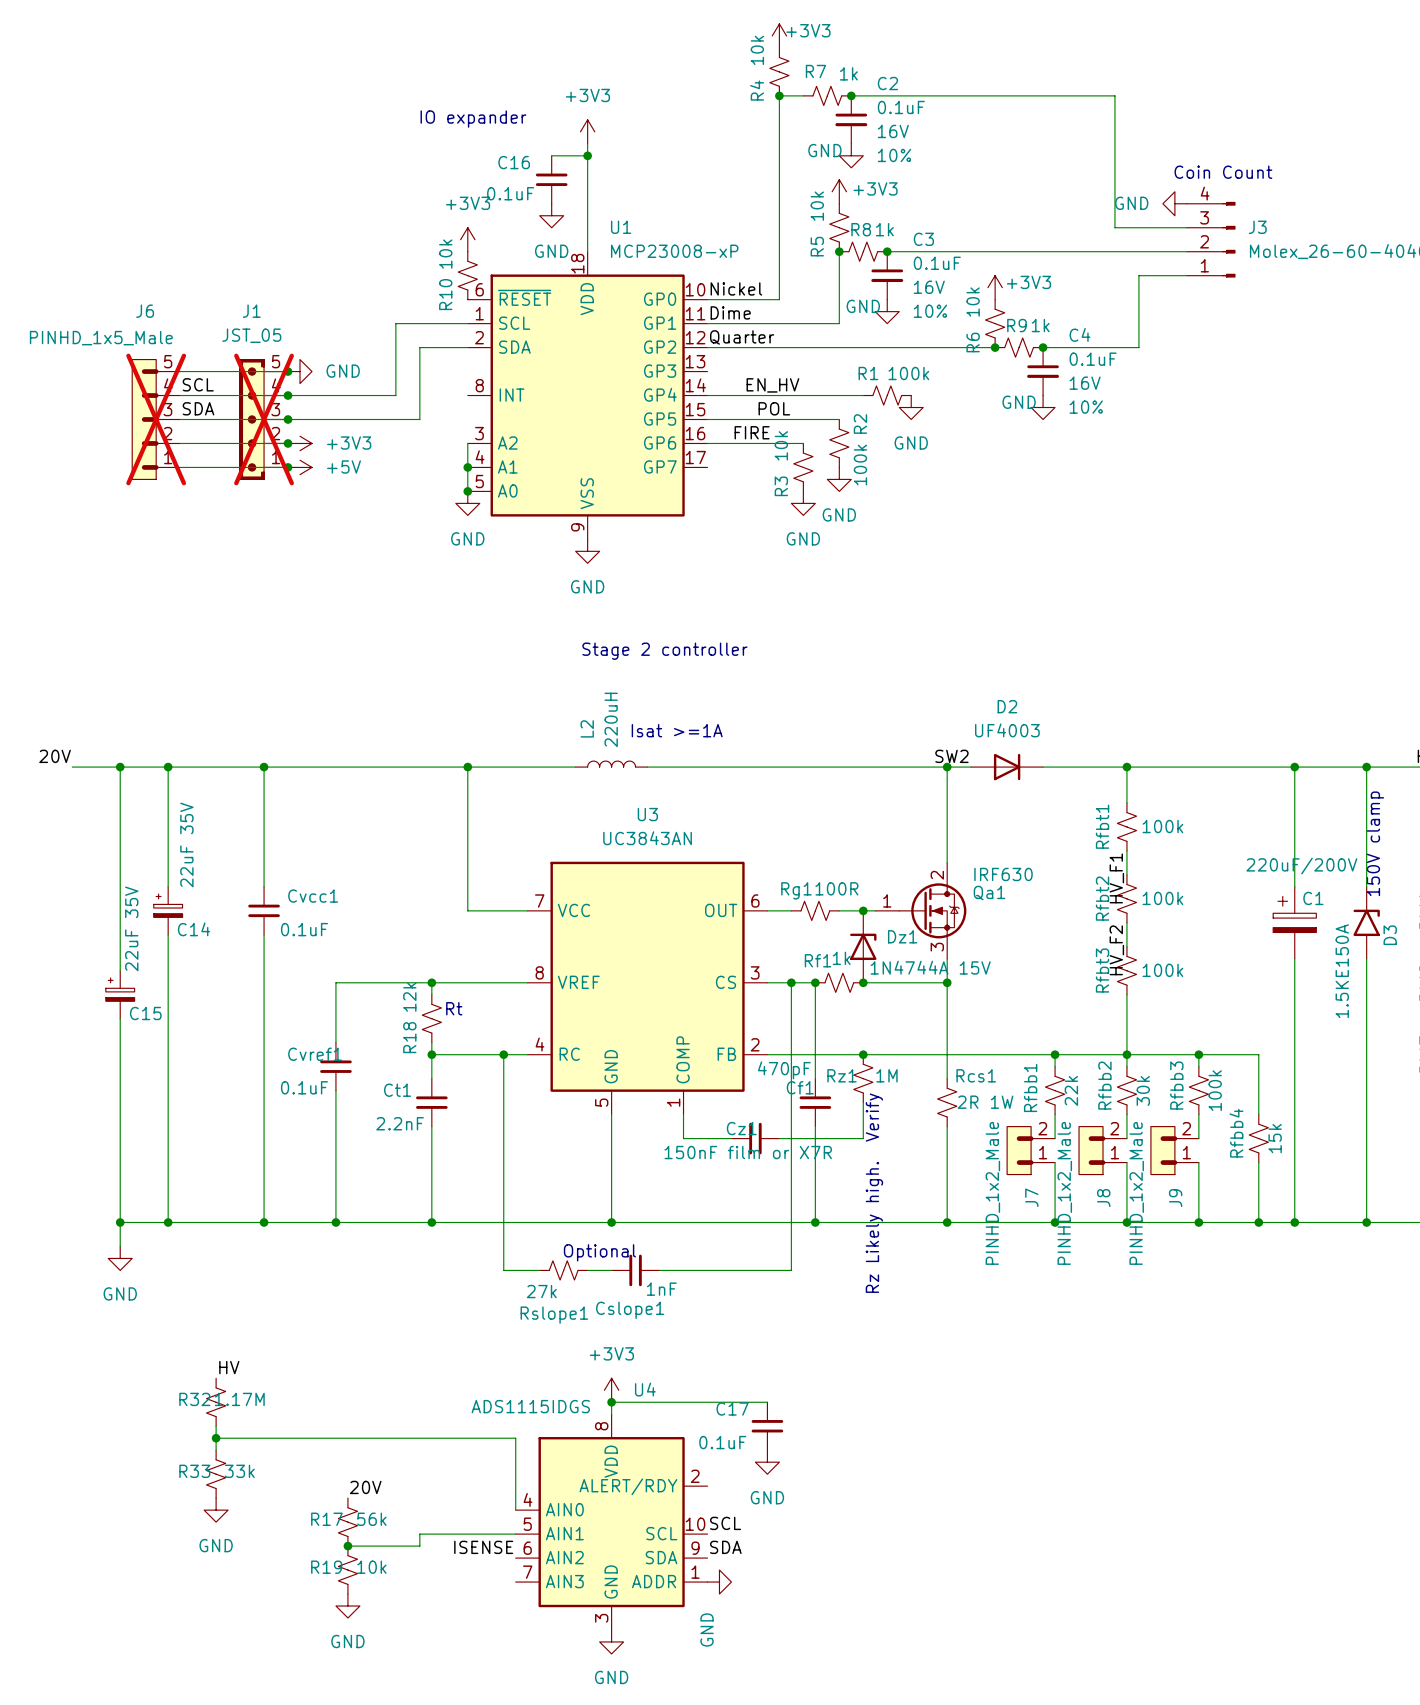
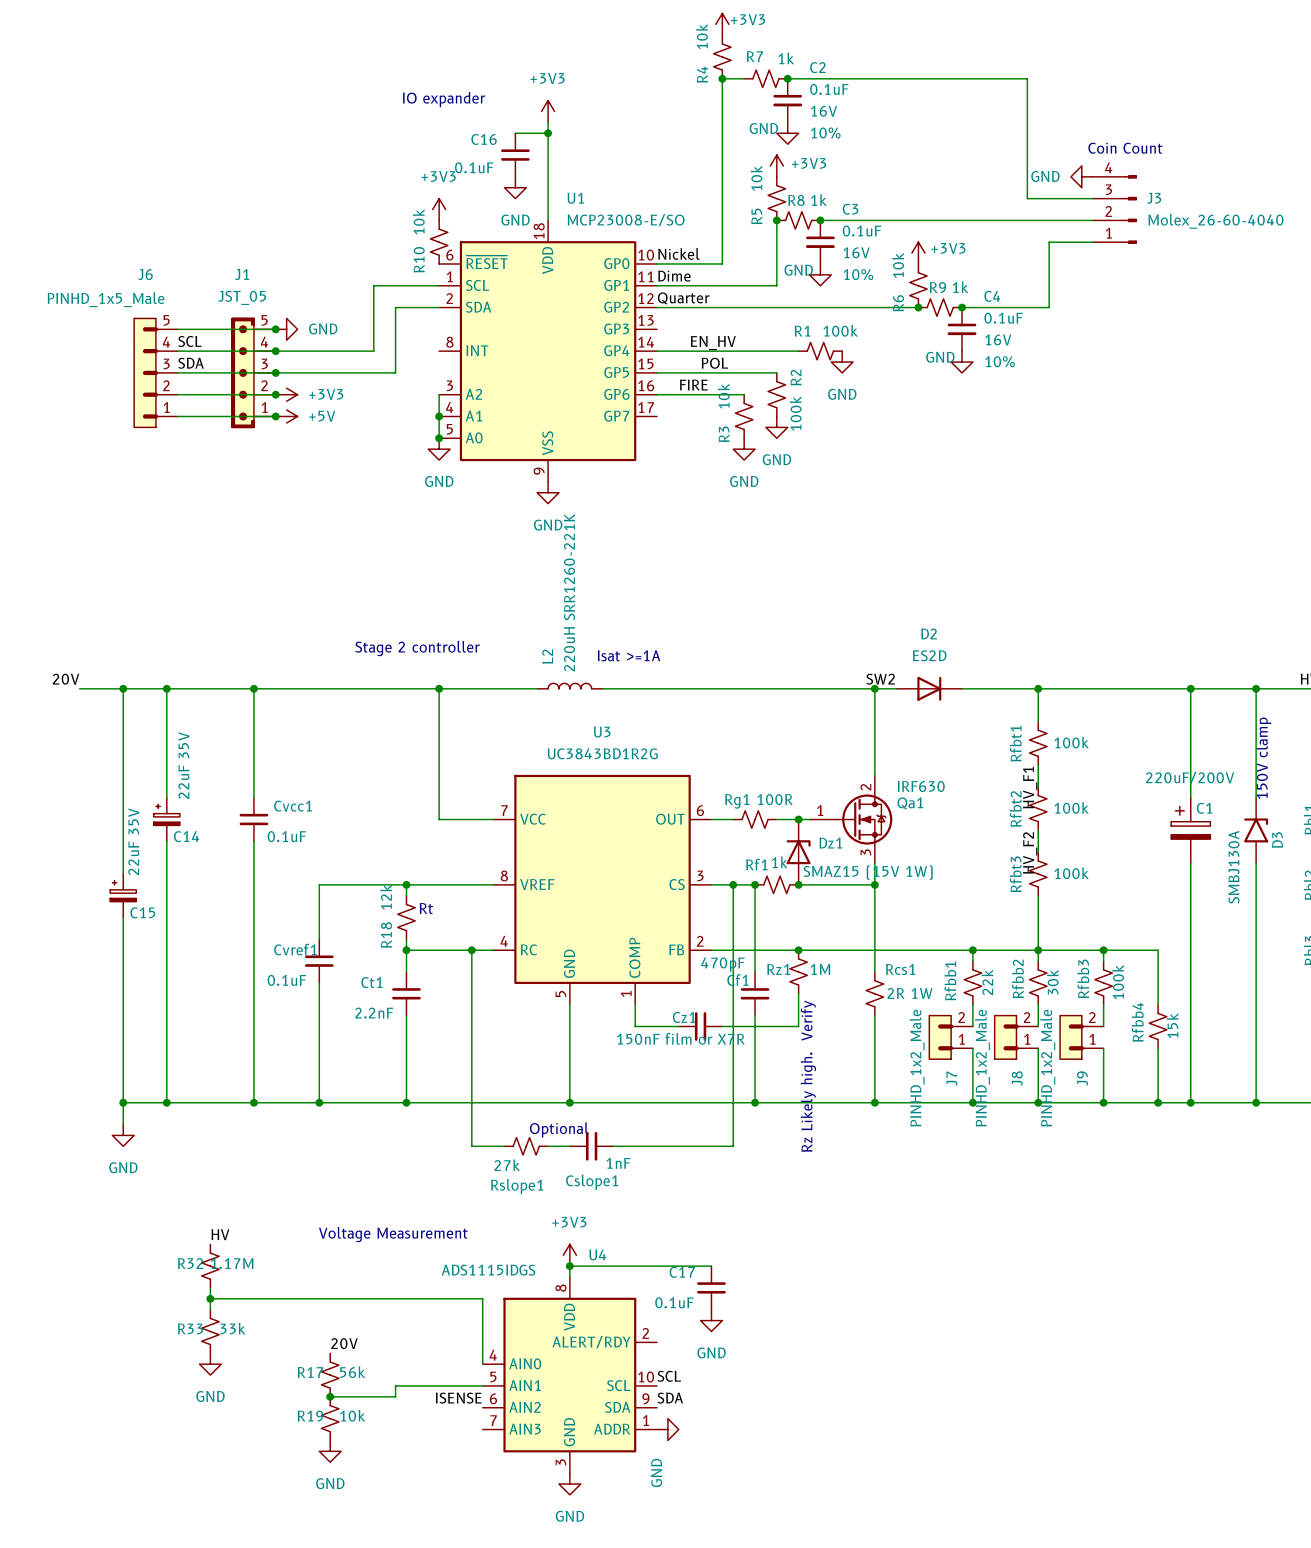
U1 value: MCP23008-xP (674, 251) -> MCP23008-E/SO (626, 220)
J6 do-not-place cross: (156, 419) -> none
J1 do-not-place cross: (264, 419) -> none
text position: Stage 2 controller (664, 651) -> Stage 2 controller (417, 648)
L2 value: 220uH (611, 719) -> 220uH SRR1260-221K (569, 592)
D2 value: UF4003 (1007, 730) -> ES2D (929, 655)
U3 value: UC3843AN (647, 838) -> UC3843BD1R2G (602, 753)
Dz1 value: 1N4744A 15V (930, 967) -> SMAZ15 (15V 1W) (868, 872)
D3 value: 1.5KE150A (1342, 971) -> SMBJ130A (1233, 867)
text: none -> Voltage Measurement (393, 1234)

